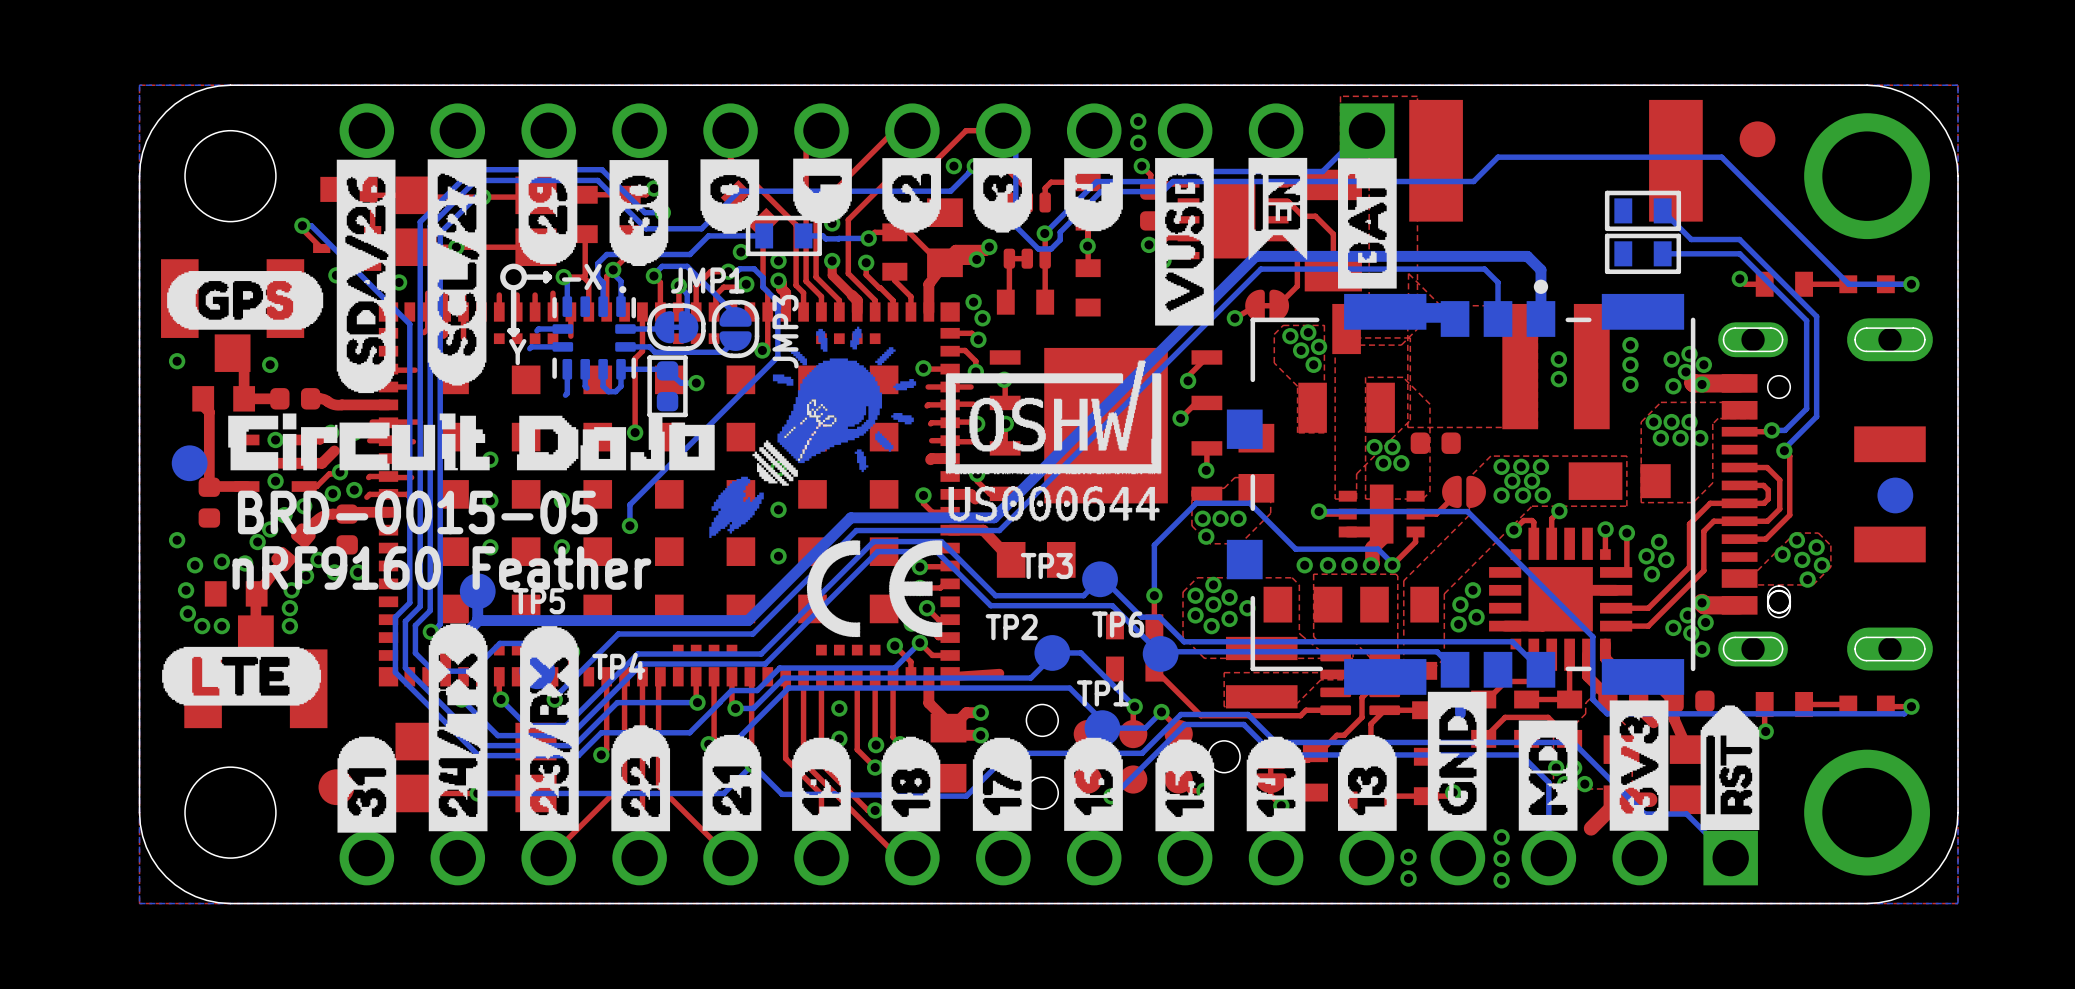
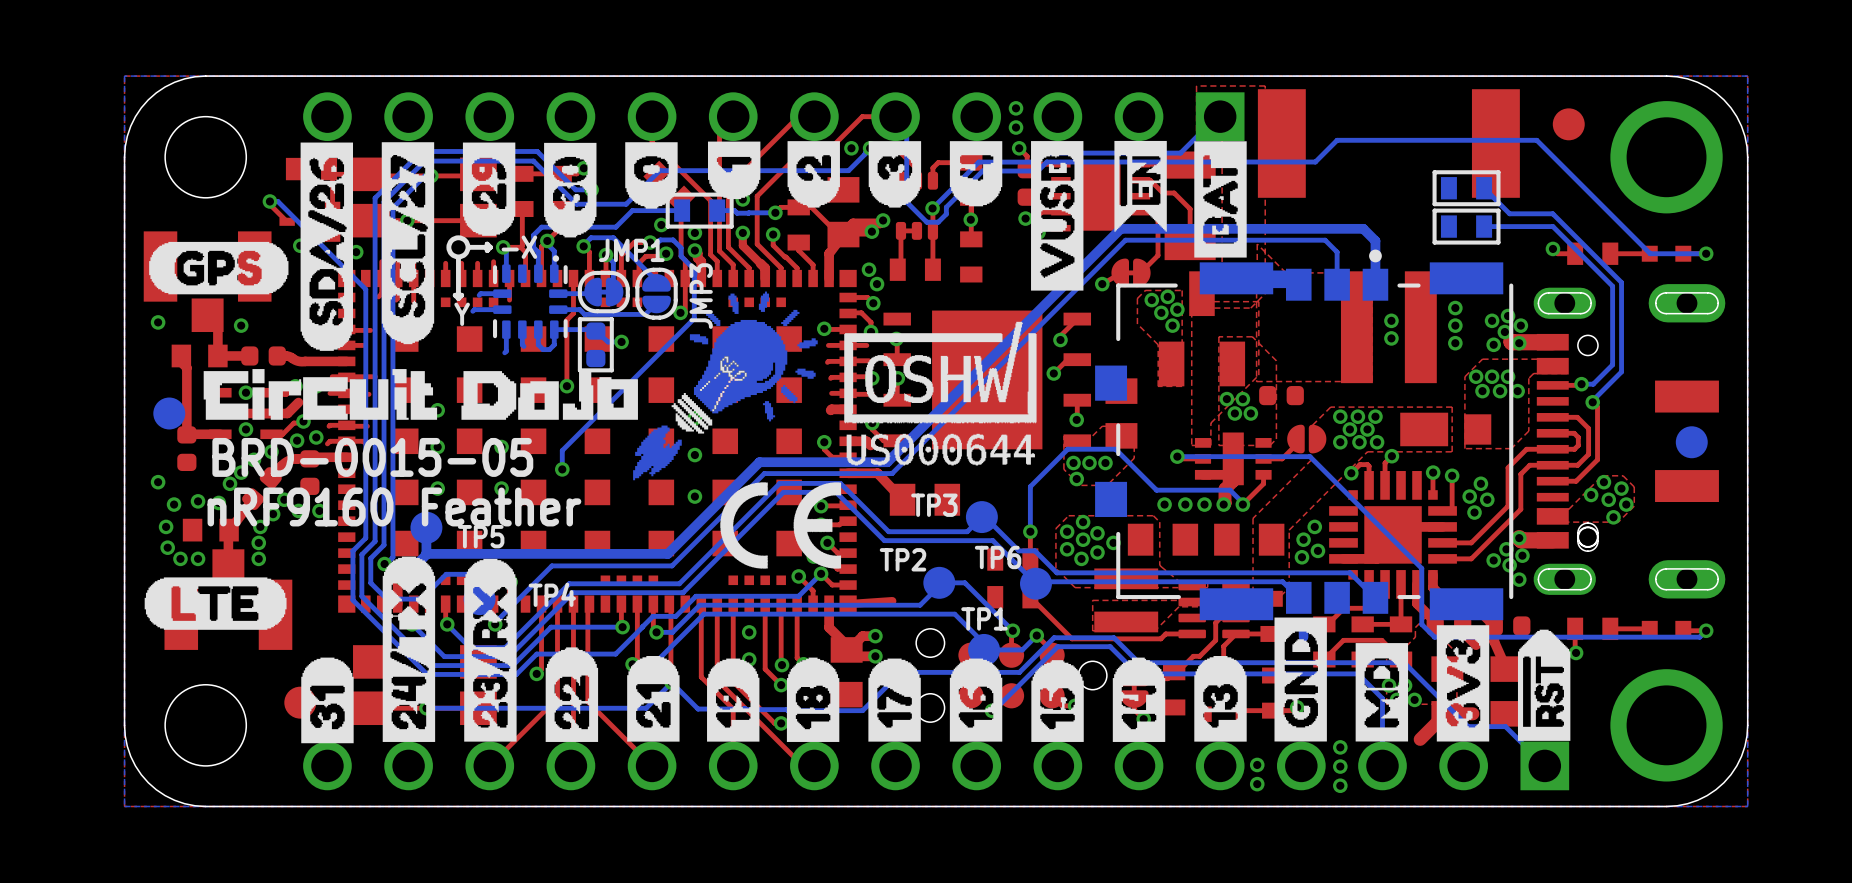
top zone outline: (1395, 574) (1397, 576) (1397, 658) (1370, 658) (1353, 640) (1317, 640) (1313, 636) (1313, 574) (1395, 574) -> none

